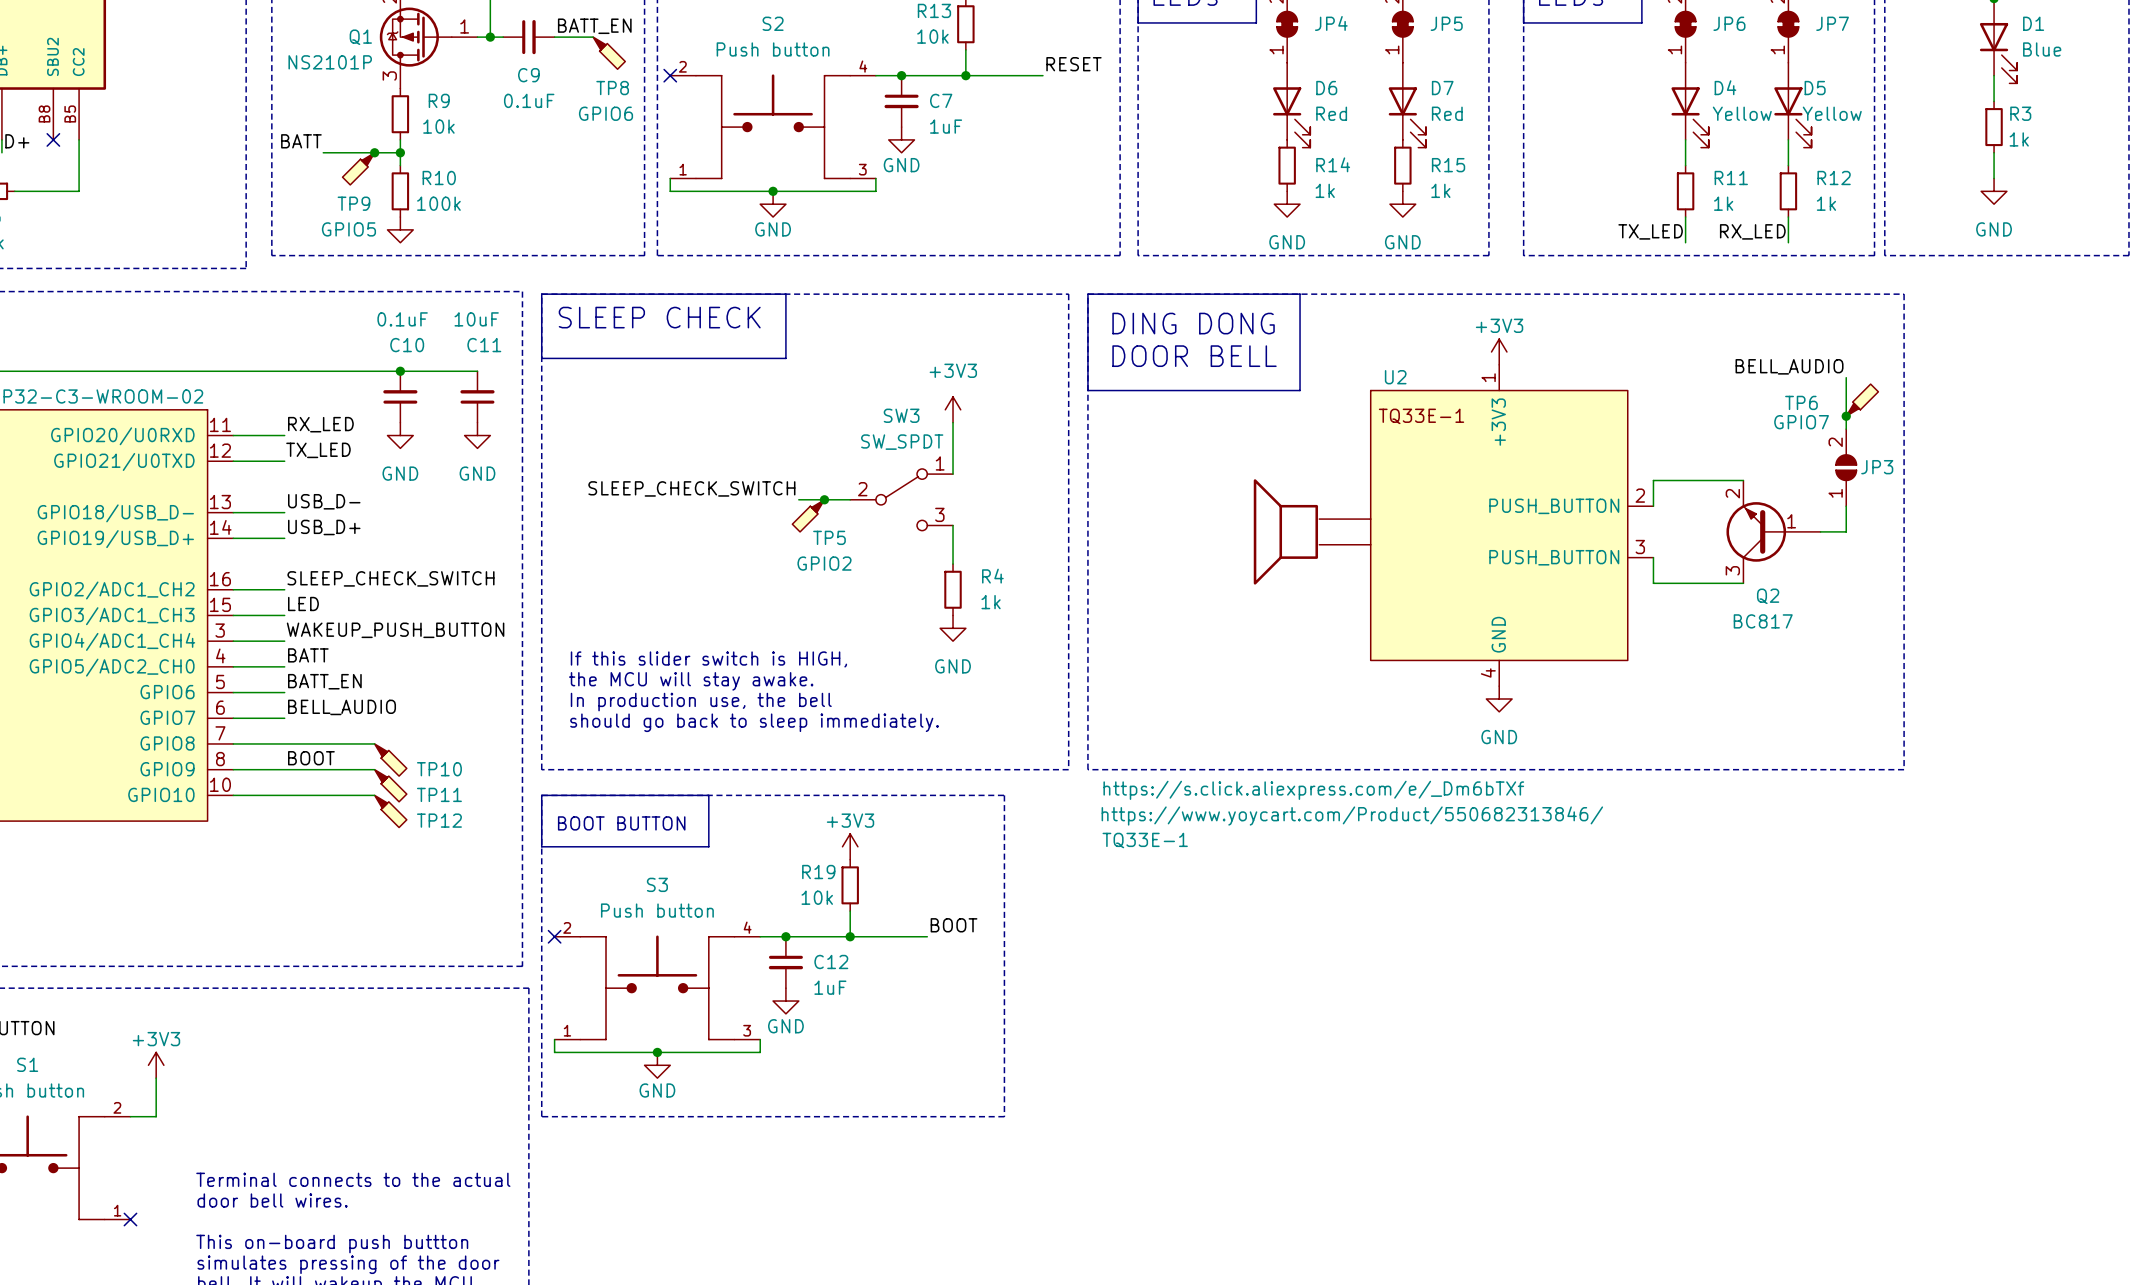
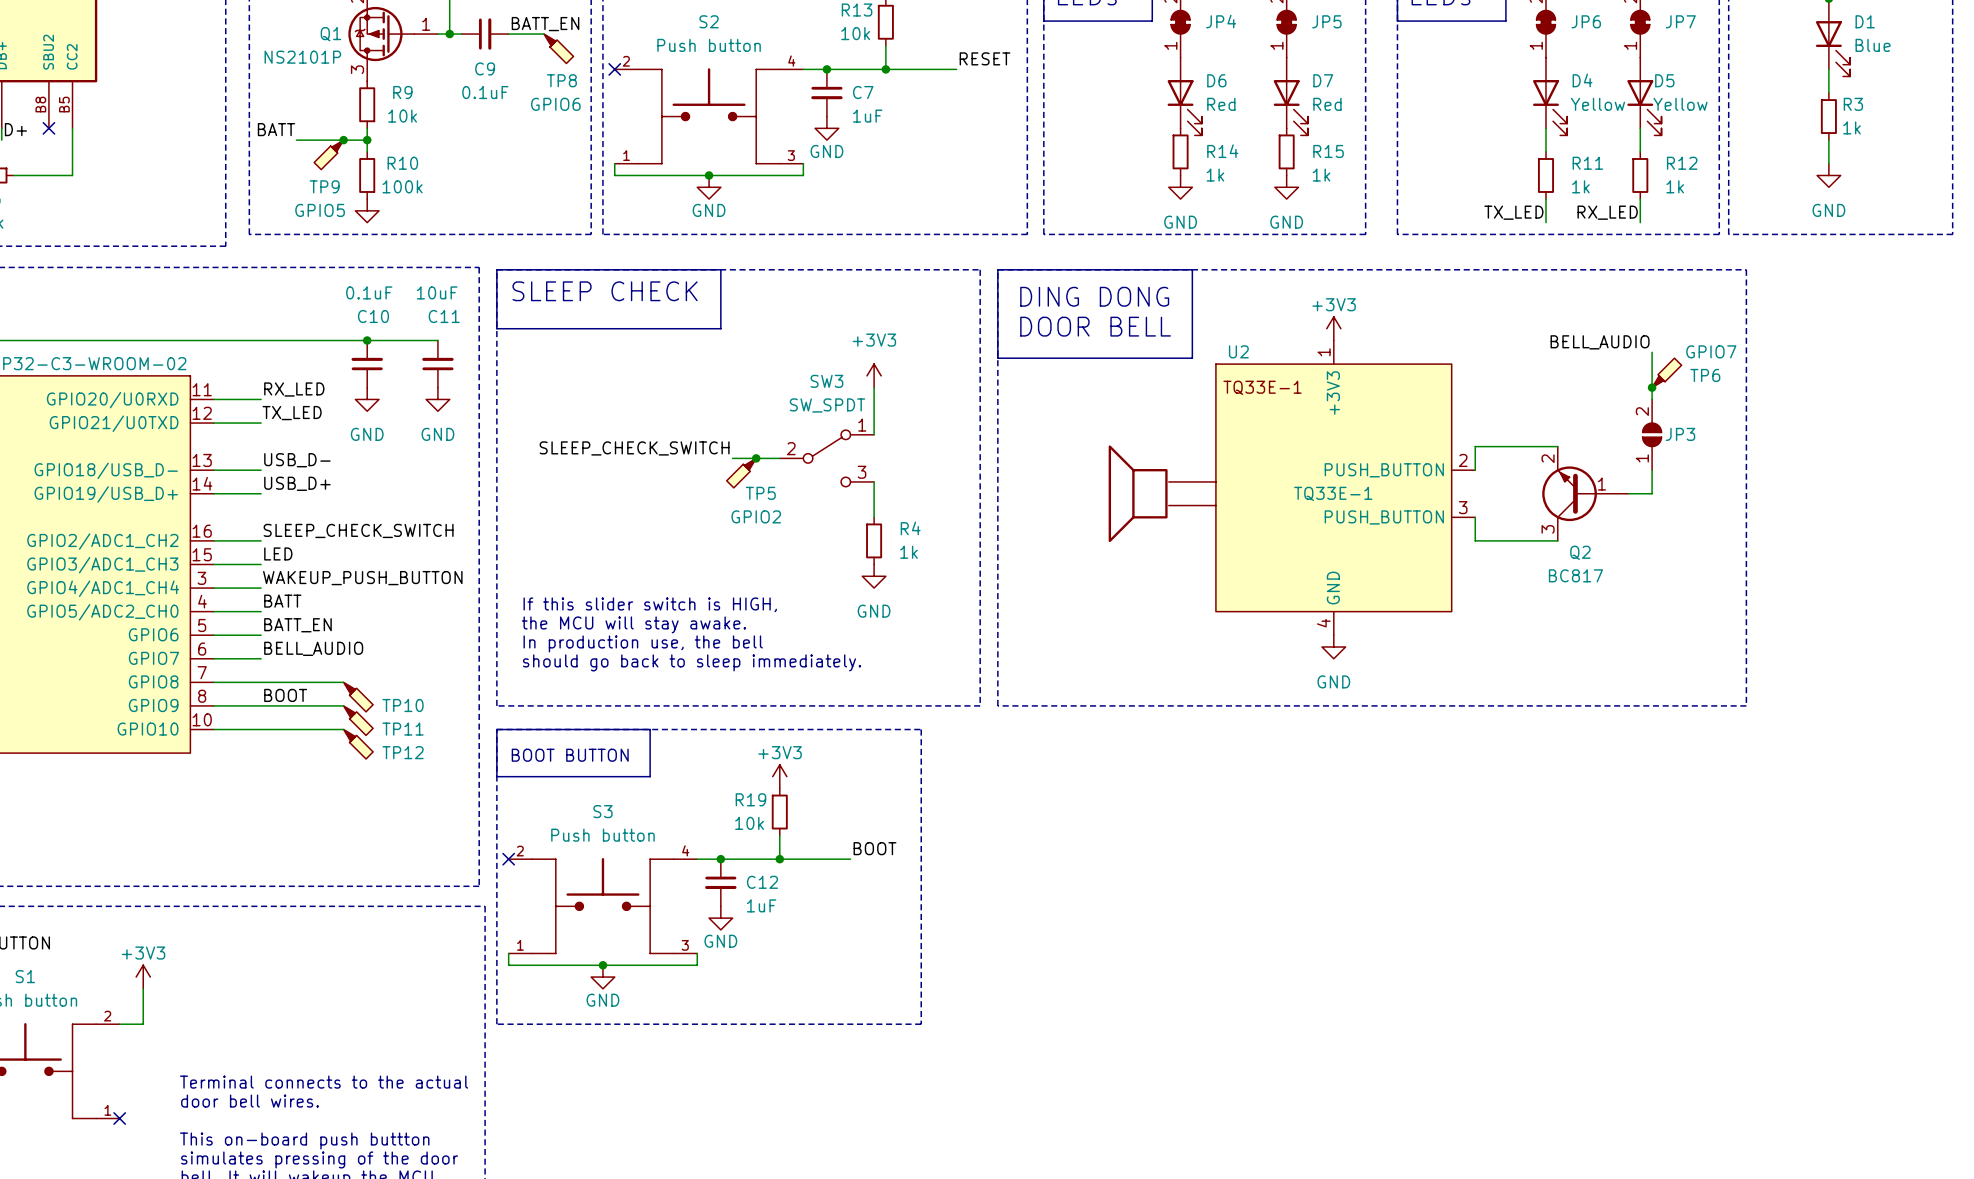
power symbol position: +3V3 (1499, 351) -> +3V3 (1333, 328)
label position: BELL_AUDIO (1789, 366) -> BELL_AUDIO (1600, 342)
wire: (1846, 377) (1846, 429) -> (1652, 352) (1652, 399)
TP6 position: (1862, 400) -> (1666, 372)
TP6 name position: TP6 (1801, 402) -> TP6 (1705, 375)
junction position: (1846, 416) -> (1652, 387)
TP6 text position: GPIO7 (1801, 422) -> GPIO7 (1711, 351)
JP3 position: (1846, 467) -> (1652, 434)
wire: (1743, 480) (1653, 480) (1653, 506) -> (1557, 446) (1475, 446) (1475, 470)
wire: (1846, 506) (1846, 531) (1820, 531) -> (1652, 470) (1652, 493) (1628, 493)
U2 position: (1453, 525) -> (1291, 487)
Q2 position: (1773, 531) -> (1585, 493)
U2 value: none -> TQ33E-1 (1333, 493)
wire: (1653, 557) (1653, 583) (1743, 583) -> (1475, 517) (1475, 540) (1557, 540)
power symbol position: GND (1499, 699) -> GND (1333, 647)
U2 text: https://s.click.aliexpress.com/e/_Dm6bTXf (1313, 790) -> none
U2 text: https://www.yoycart.com/Product/550682313846/ (1352, 816) -> none
U2 text: TQ33E-1 (1145, 840) -> none

